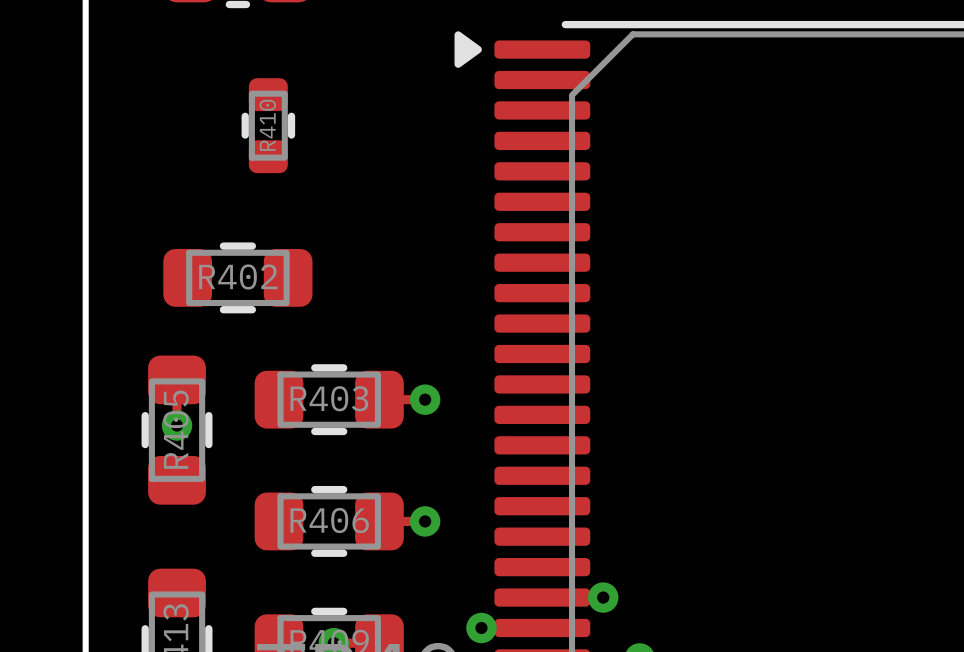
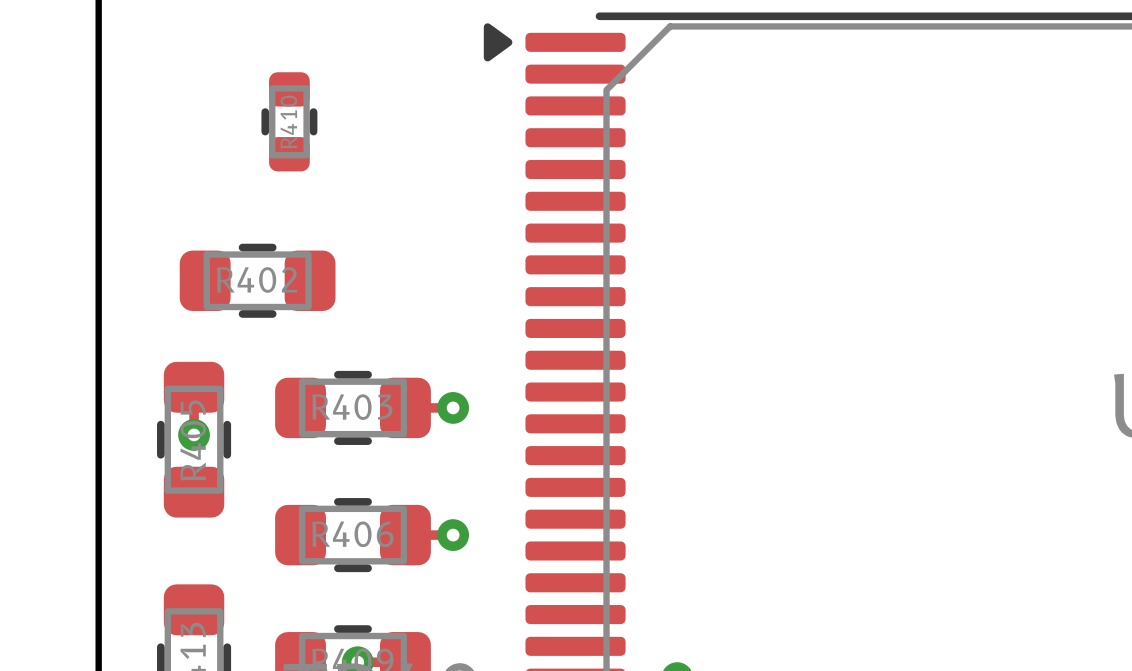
via: (603, 597) -> none
via: (481, 627) -> none

